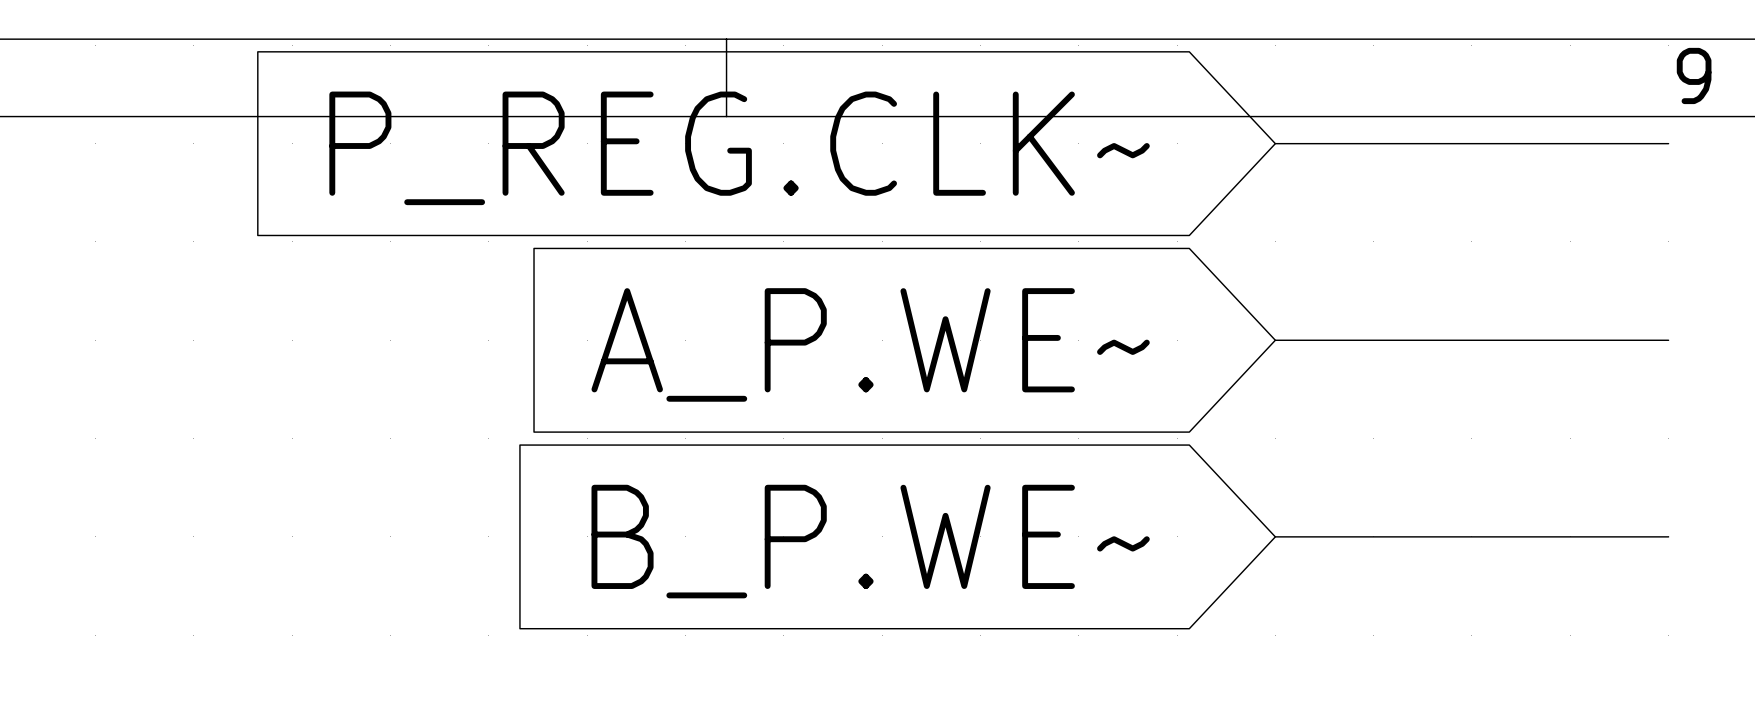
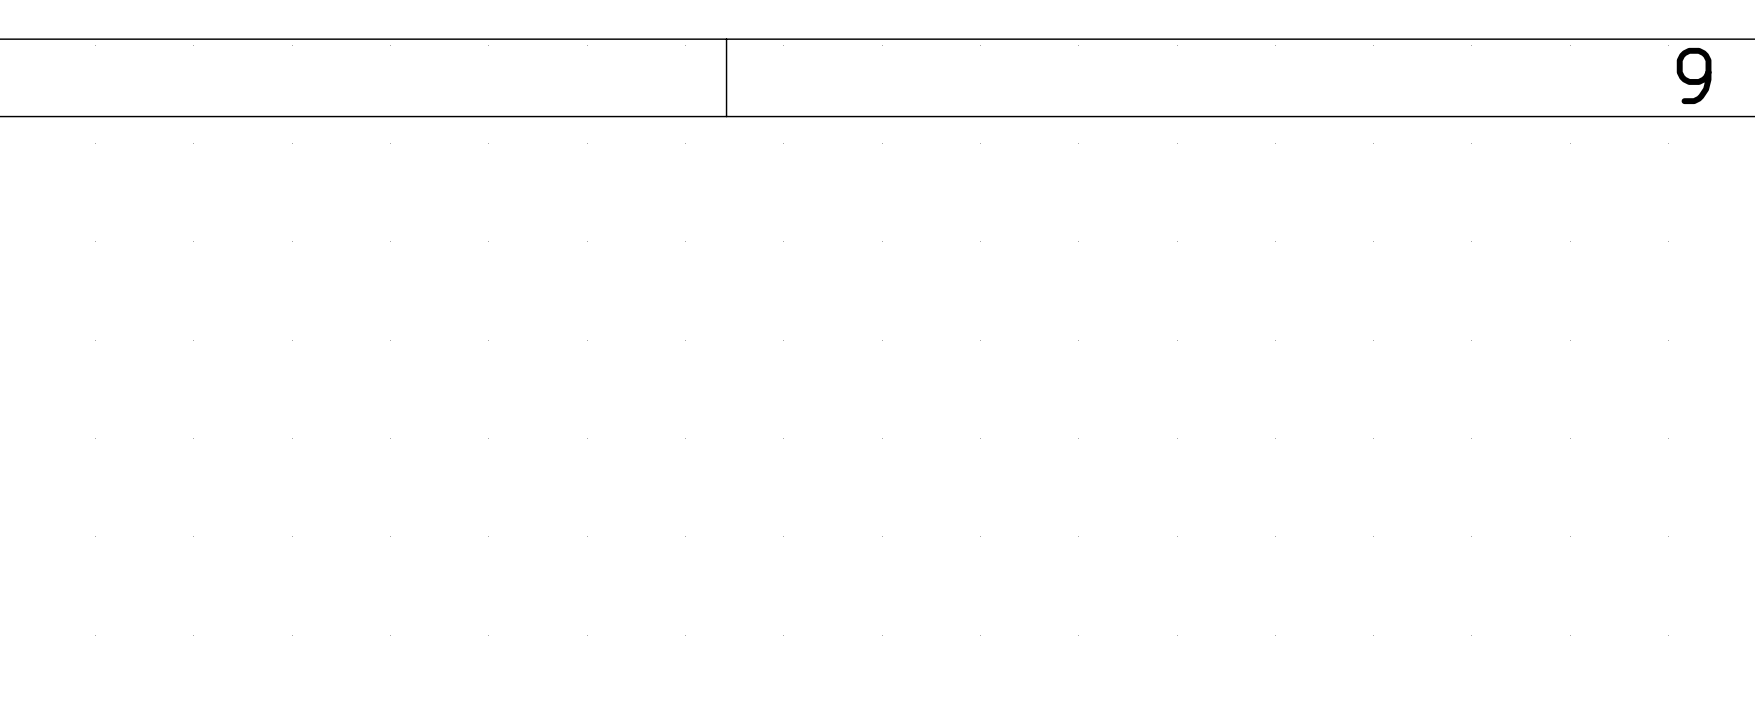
wire: (1275, 143) (1668, 143) -> none
global label: P_REG.CLK~ (739, 148) -> none
wire: (1275, 340) (1668, 340) -> none
global label: A_P.WE~ (870, 344) -> none
wire: (1275, 536) (1668, 536) -> none
global label: B_P.WE~ (870, 541) -> none

